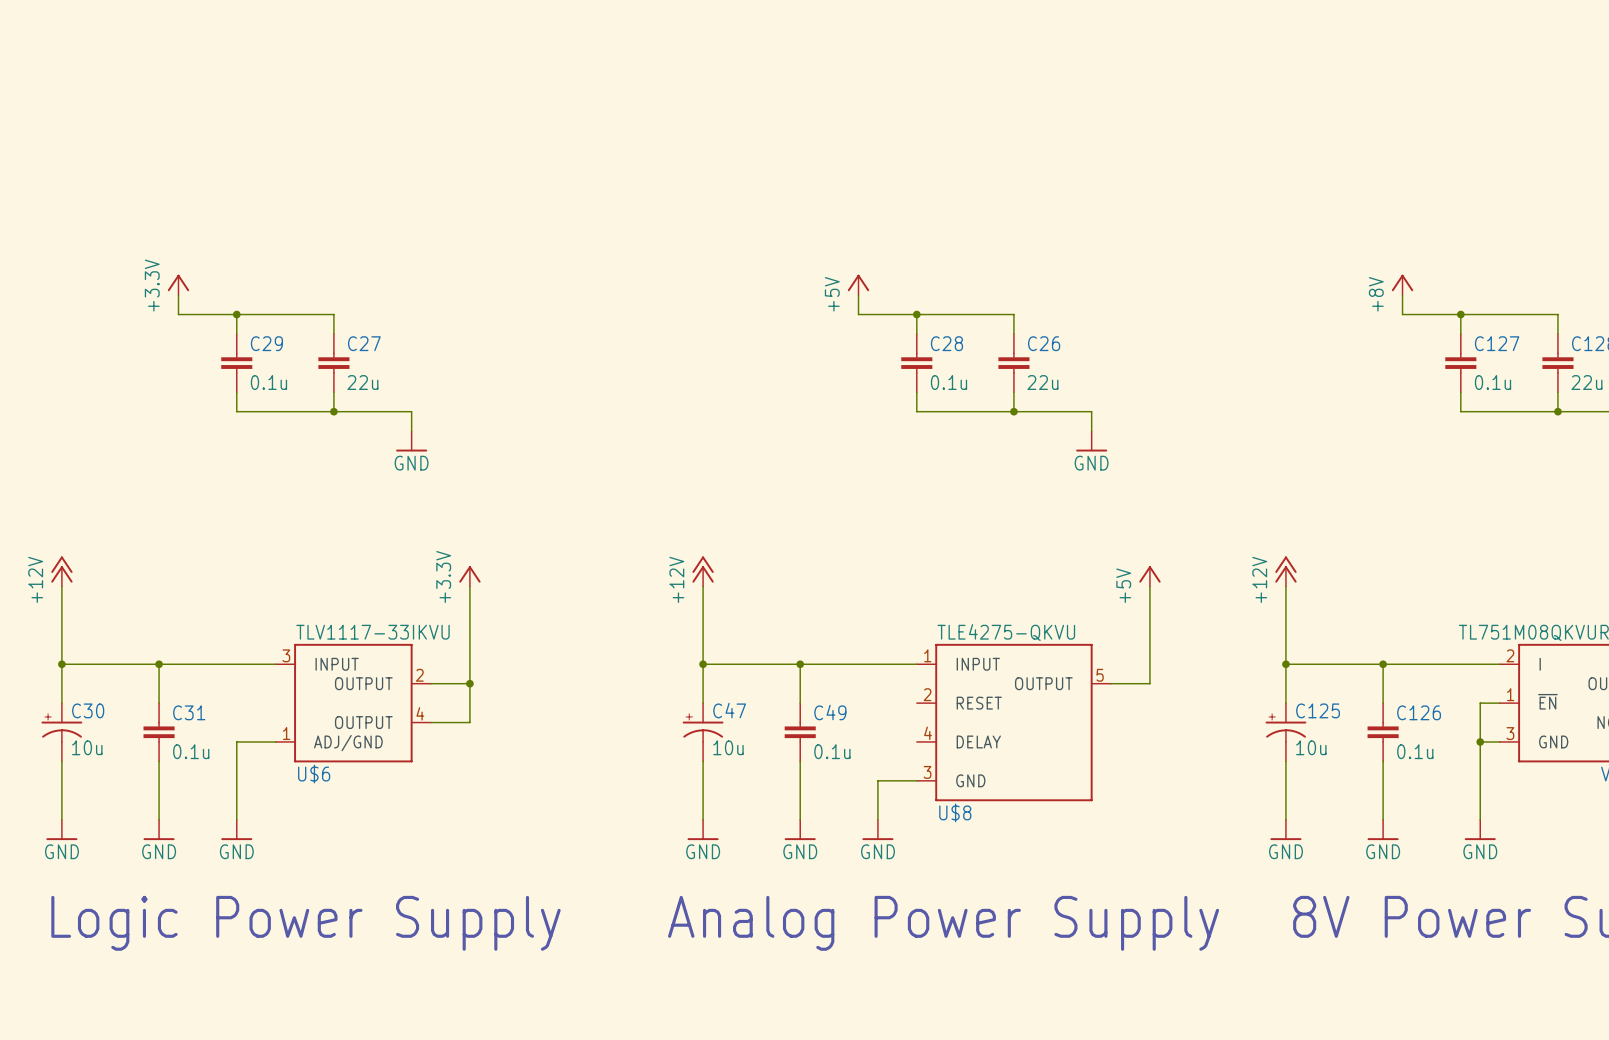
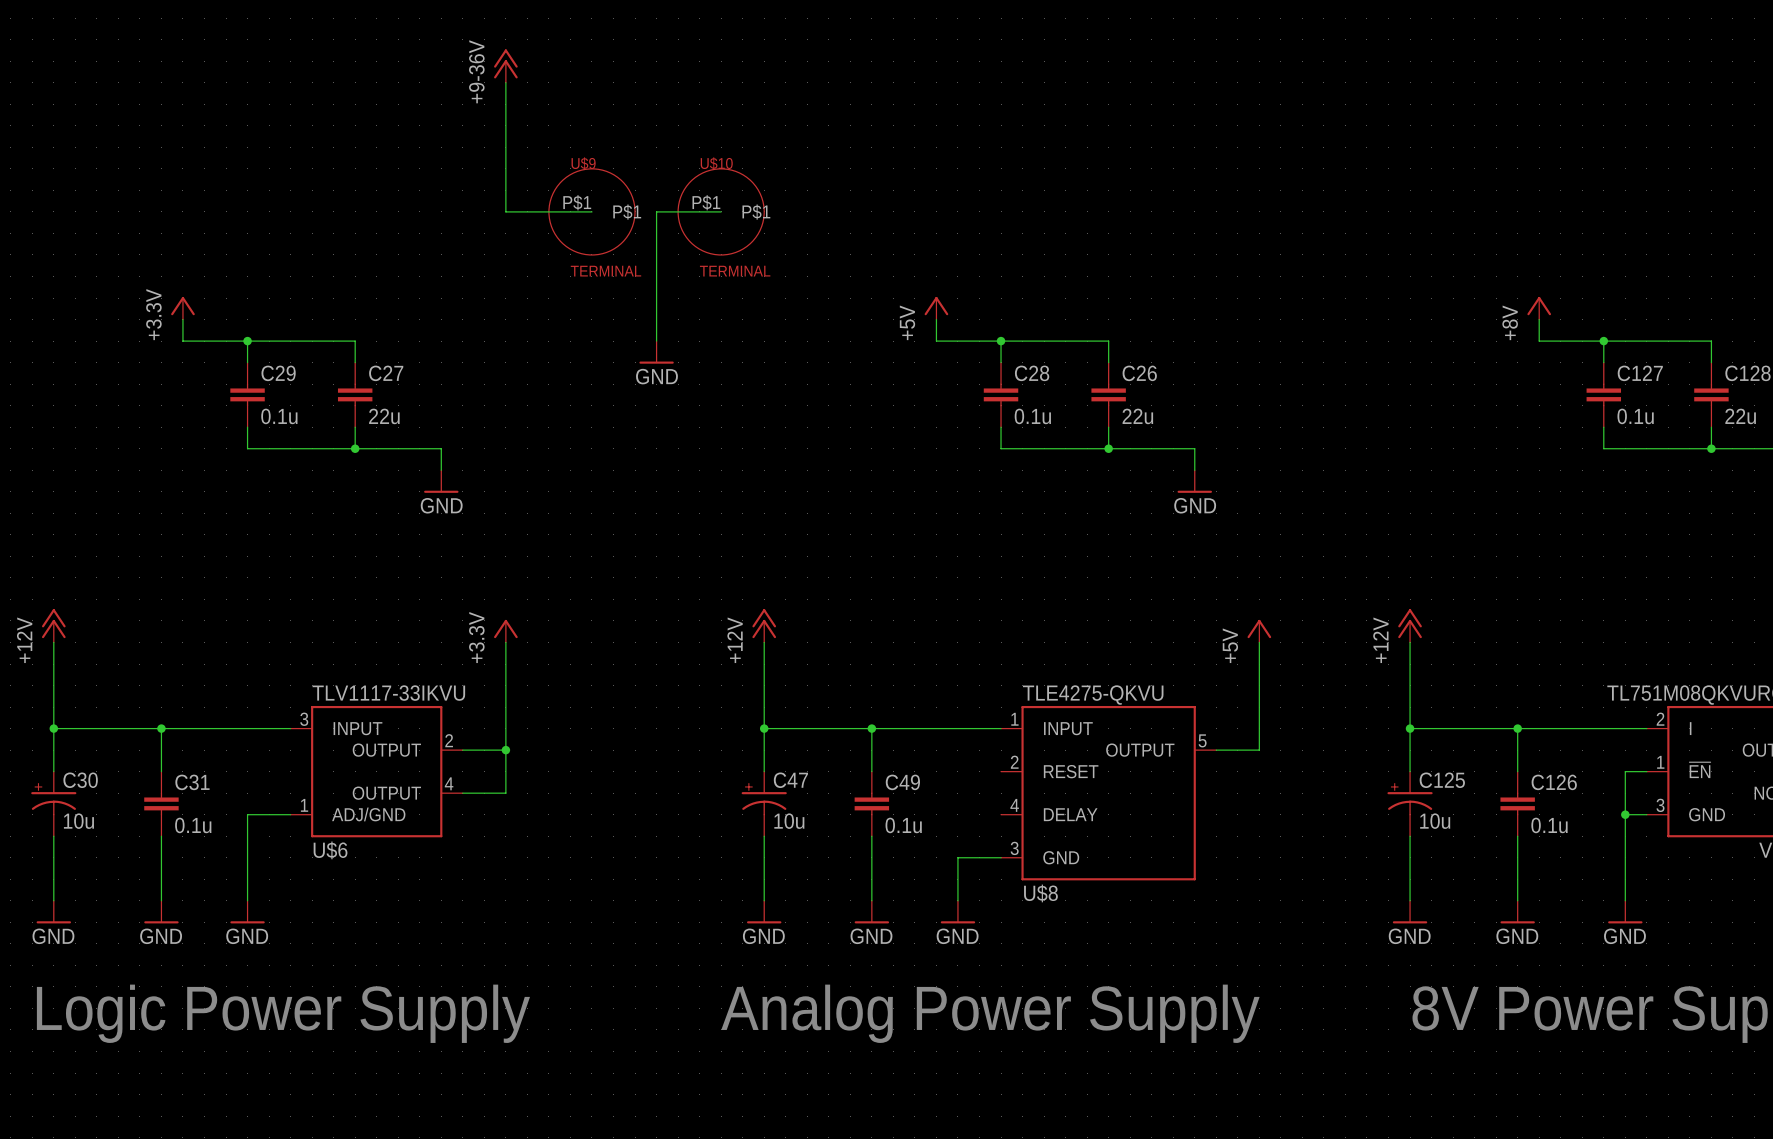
power symbol: none -> +9-36V (505, 66)
wire: none -> (505, 82) (505, 211) (591, 211)
U$9: none -> TERMINAL (591, 211)
wire: none -> (721, 211) (656, 211) (656, 341)
U$10: none -> TERMINAL (721, 211)
power symbol: none -> GND (656, 352)

